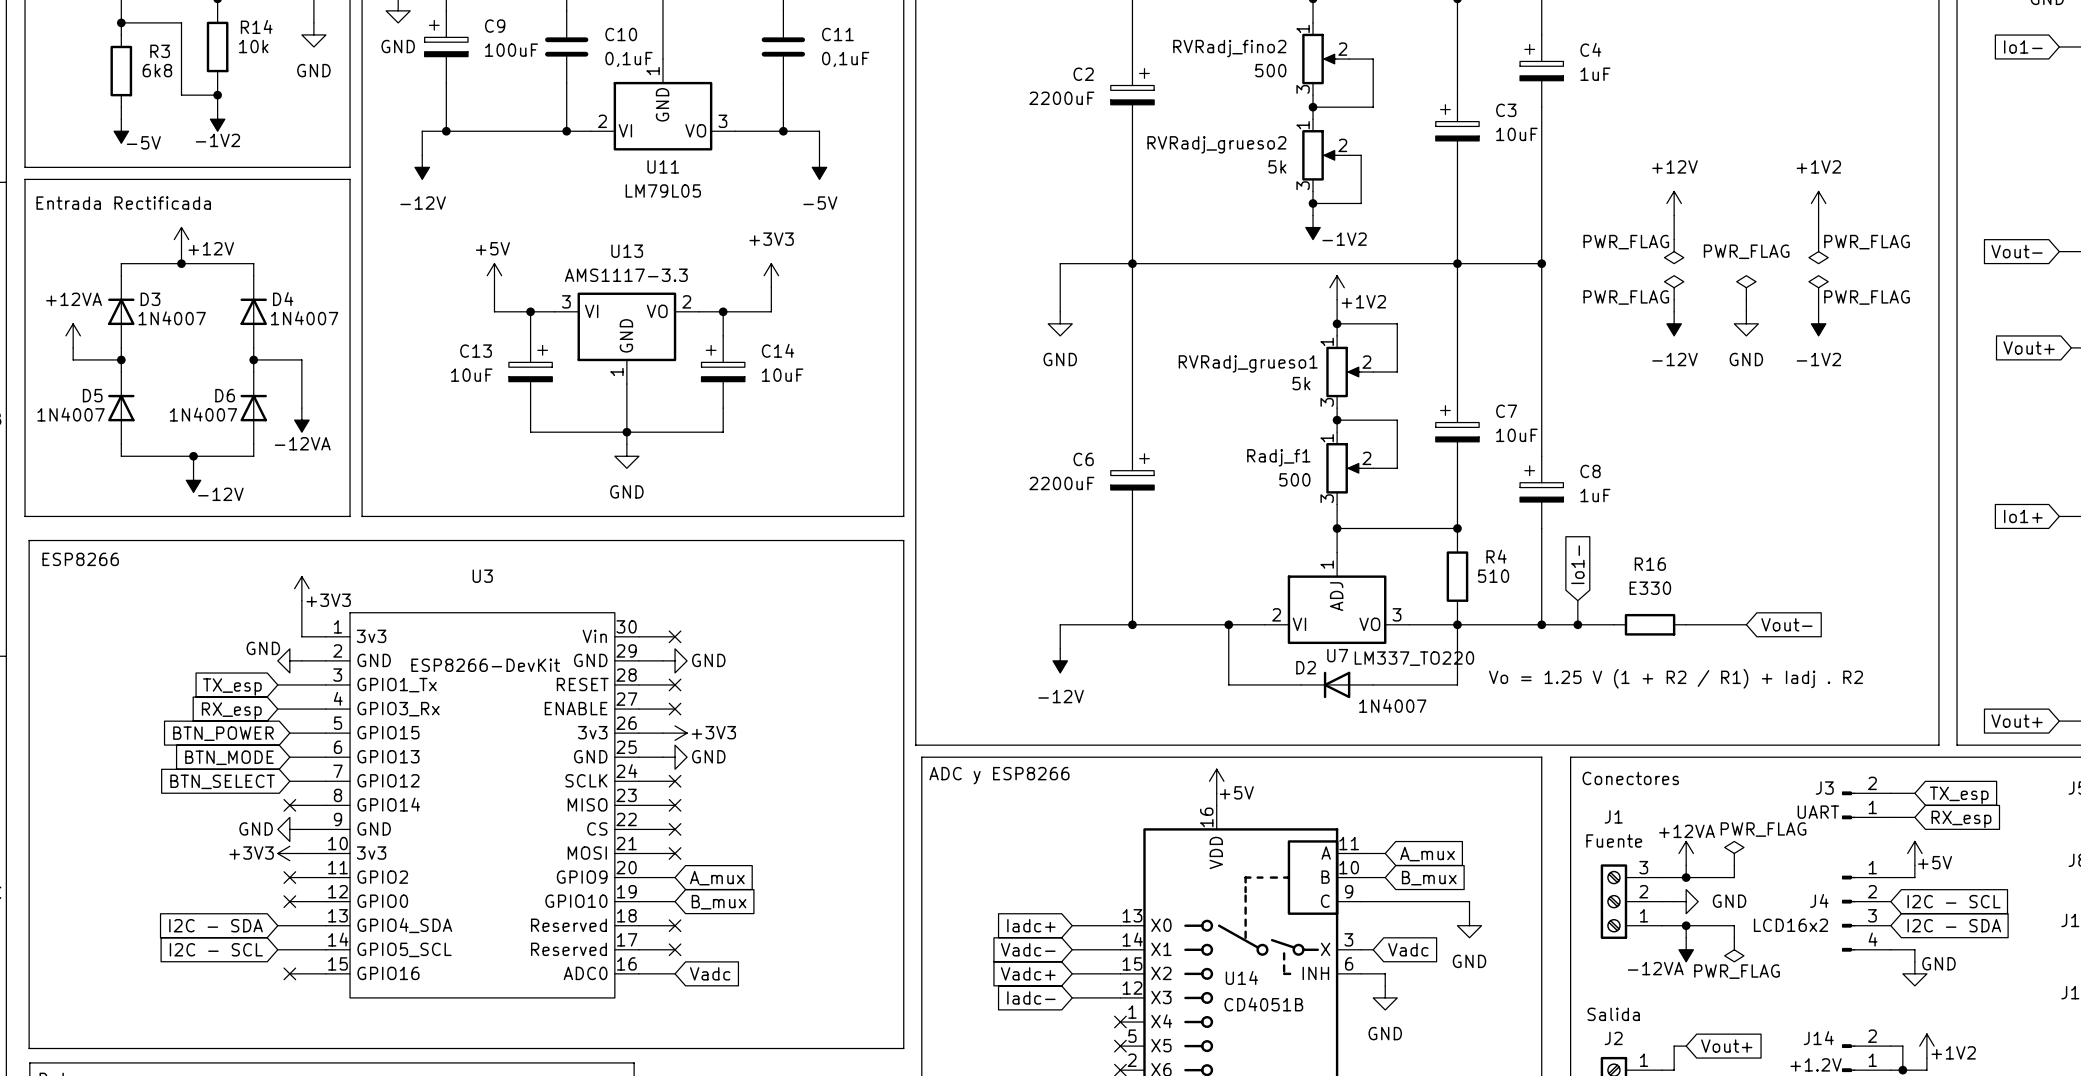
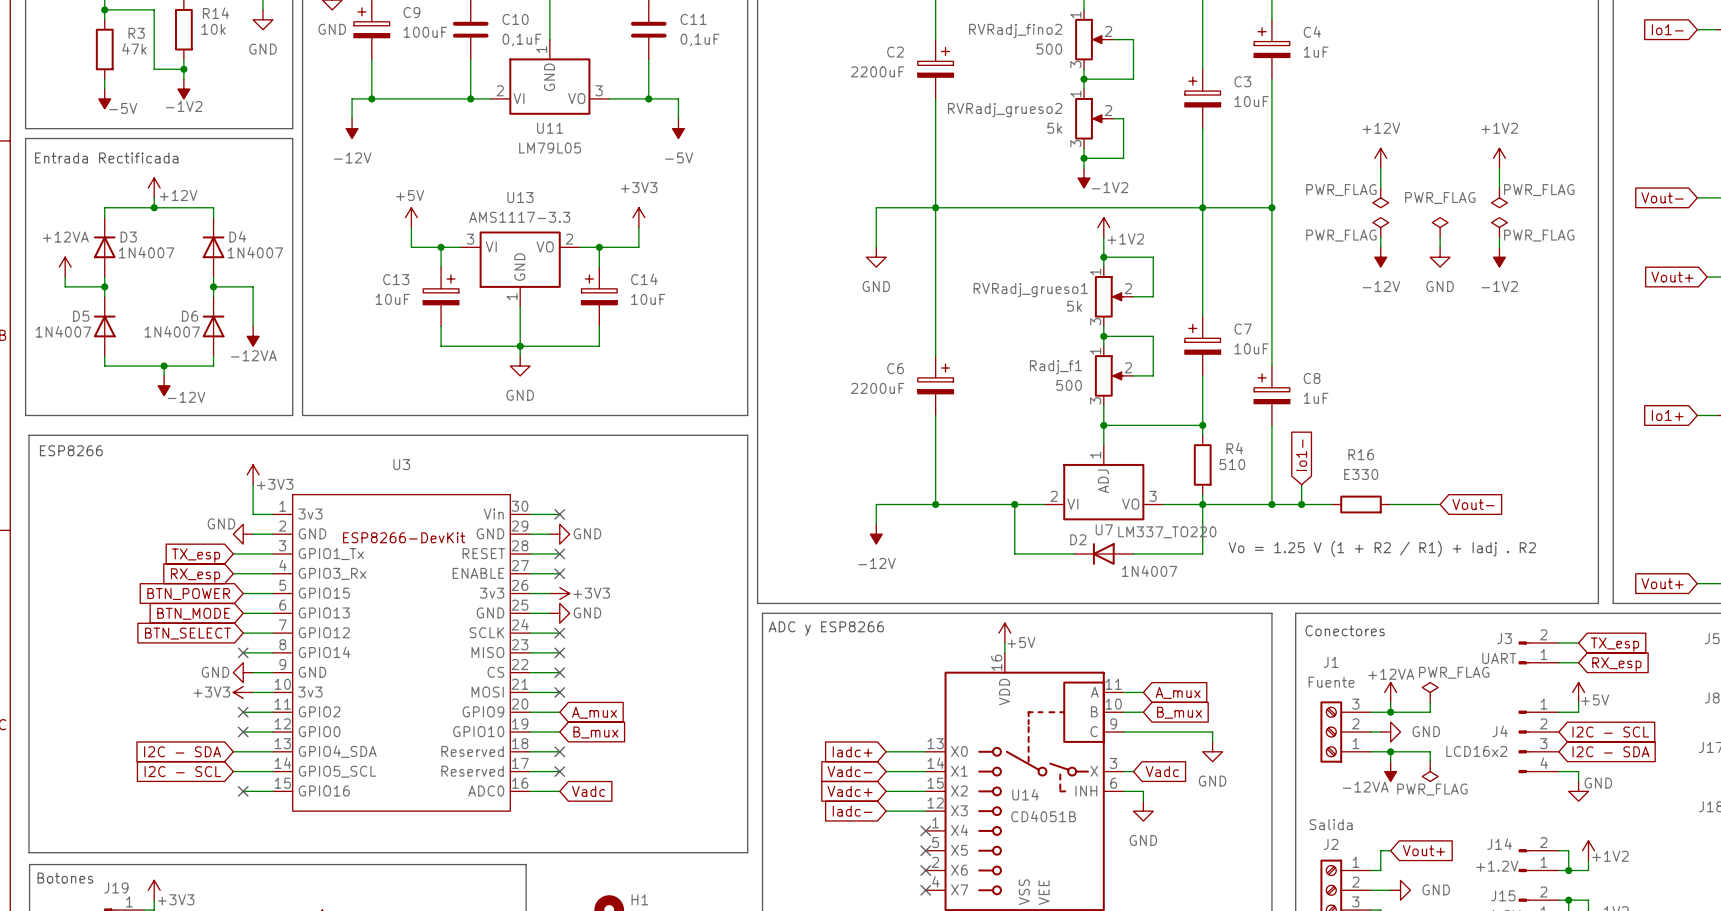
R3 value: 6k8 (157, 70) -> 47k (134, 48)

